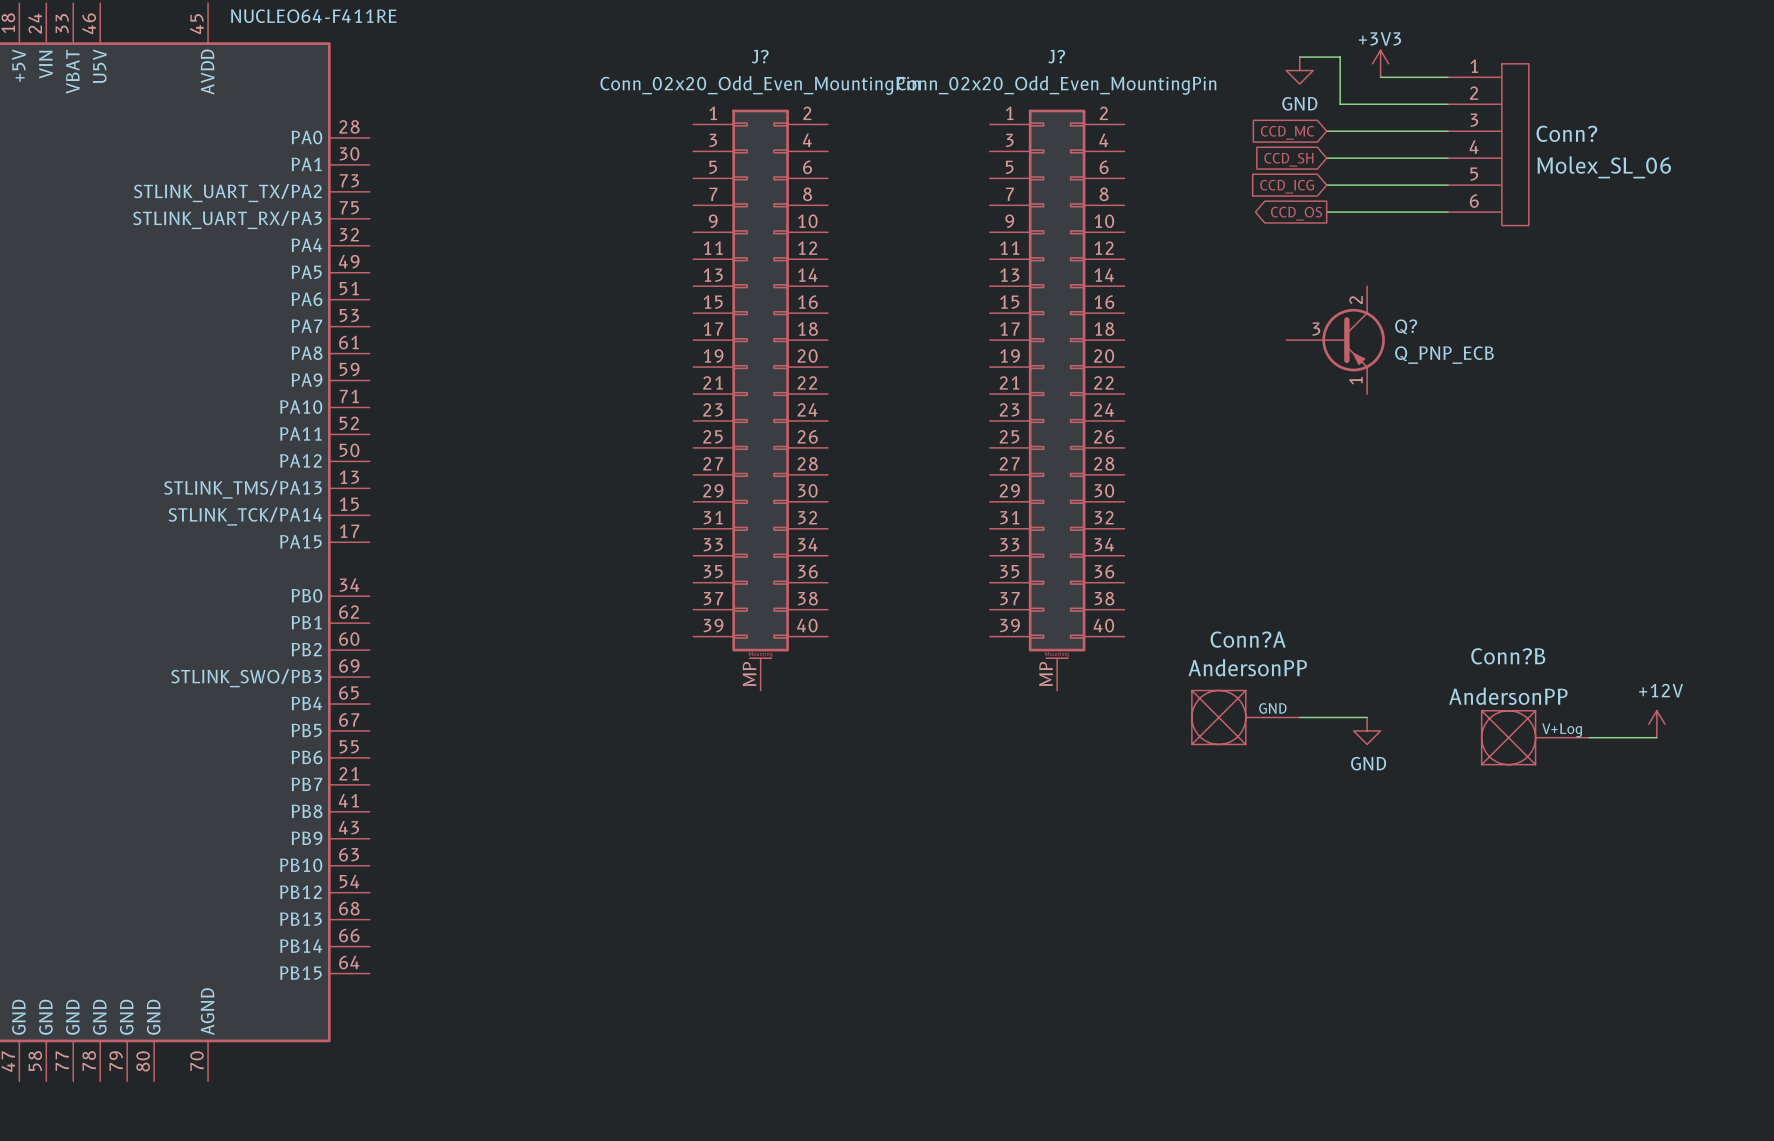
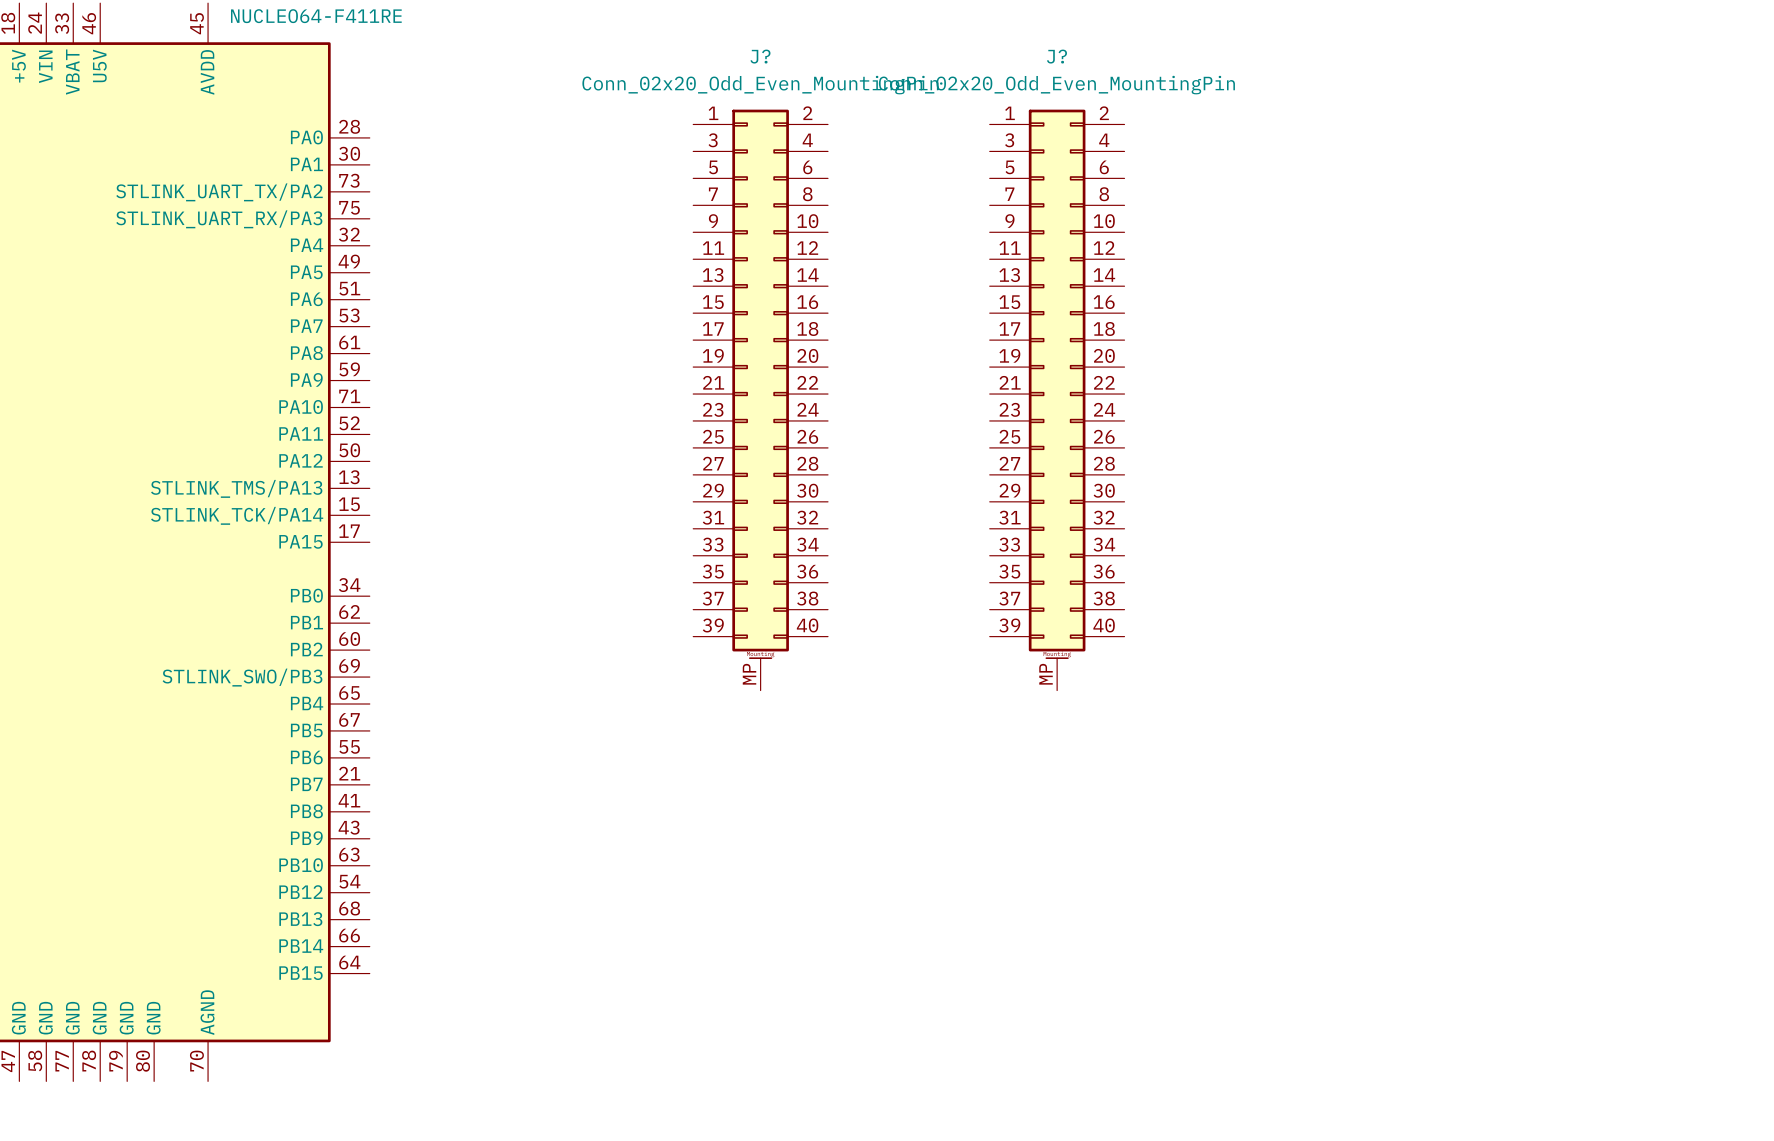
wire: (1299, 57) (1340, 57) (1340, 104) (1447, 104) -> none
power symbol: +3V3 (1380, 63) -> none
power symbol: GND (1299, 70) -> none
wire: (1380, 77) (1447, 77) -> none
wire: (1326, 131) (1447, 131) -> none
global label: CCD_MC (1287, 132) -> none
Conn?: Molex_SL_06 (1488, 144) -> none
wire: (1326, 158) (1447, 158) -> none
global label: CCD_SH (1288, 159) -> none
wire: (1326, 185) (1447, 185) -> none
global label: CCD_ICG (1287, 186) -> none
wire: (1326, 212) (1447, 212) -> none
global label: CCD_OS (1296, 213) -> none
Q?: Q_PNP_ECB (1335, 340) -> none
Conn?A: AndersonPP (1245, 717) -> none
wire: (1299, 717) (1367, 717) -> none
power symbol: +12V (1656, 724) -> none
power symbol: GND (1367, 730) -> none
Conn?B: AndersonPP (1535, 737) -> none
wire: (1589, 737) (1656, 737) -> none

